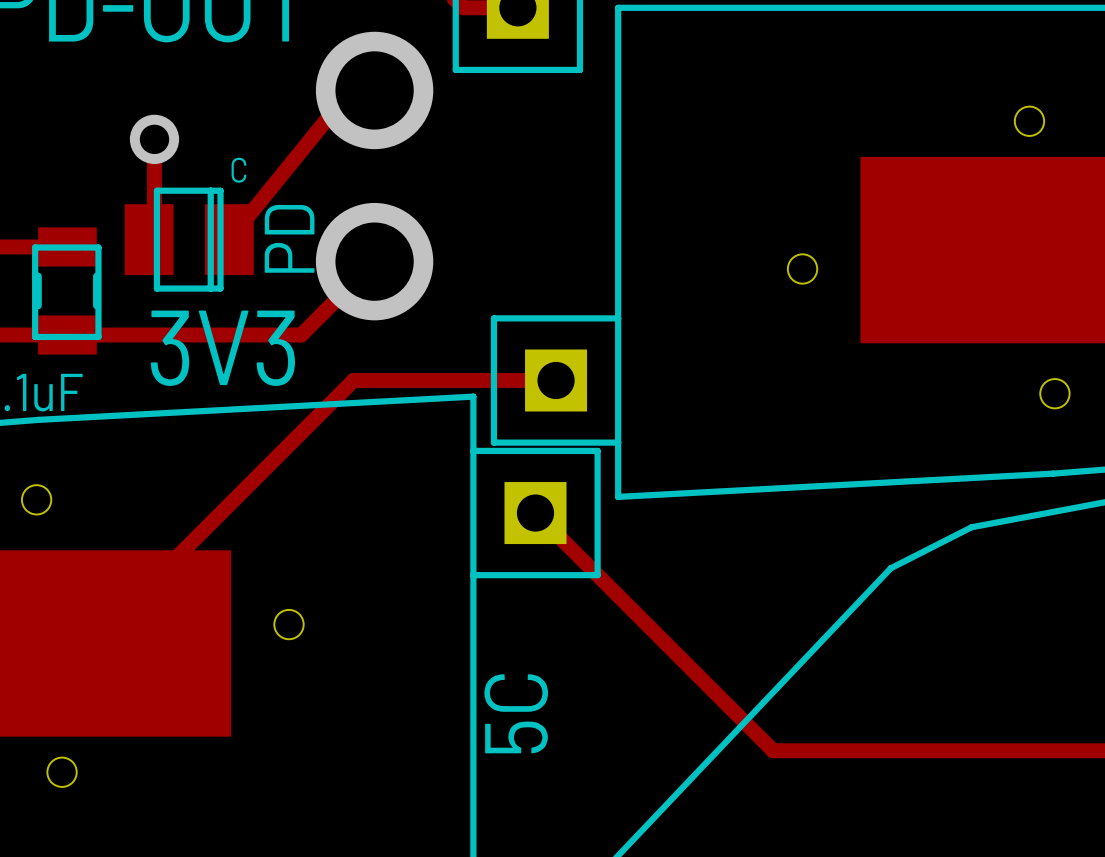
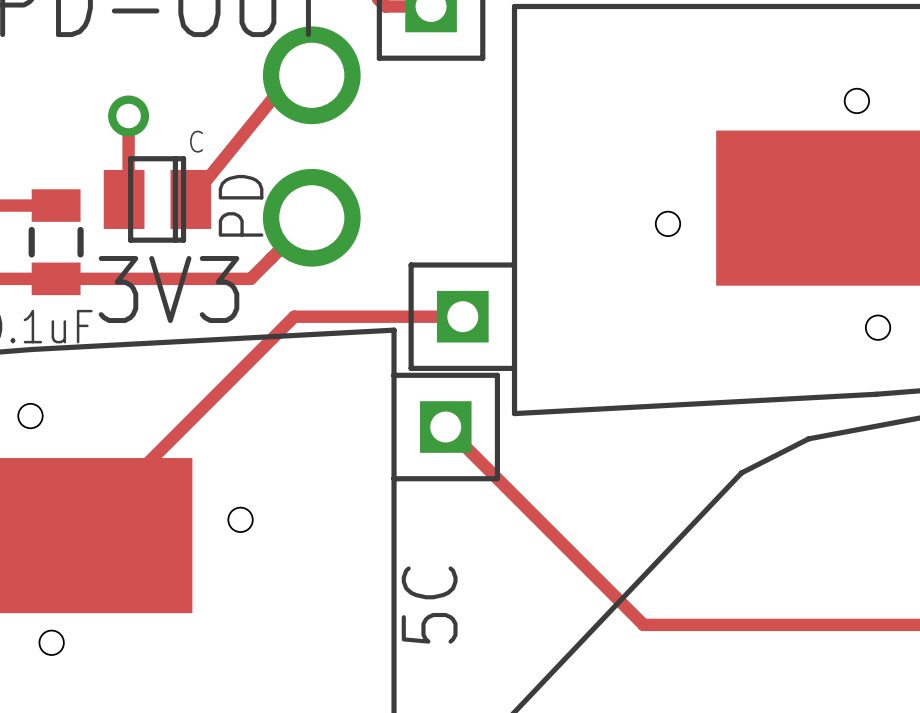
part footprint: [32, 227, 102, 355] -> [28, 189, 84, 296]

